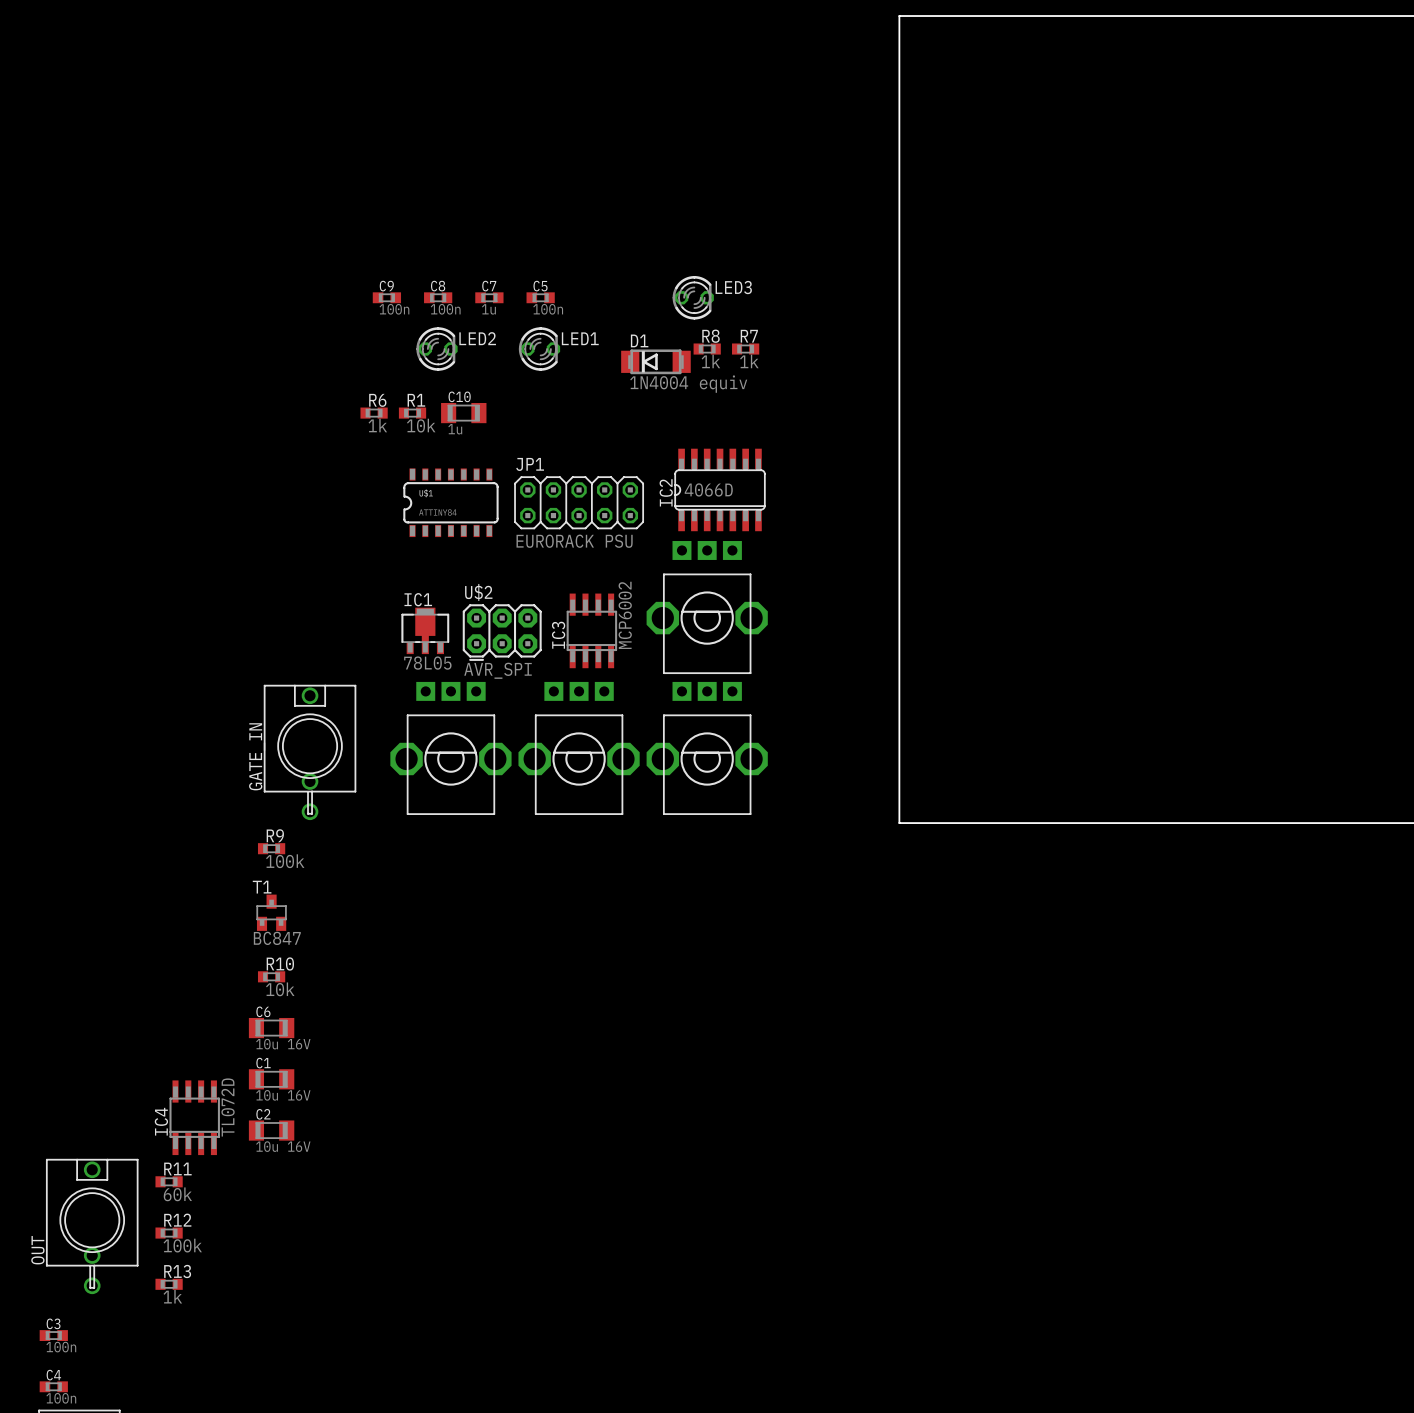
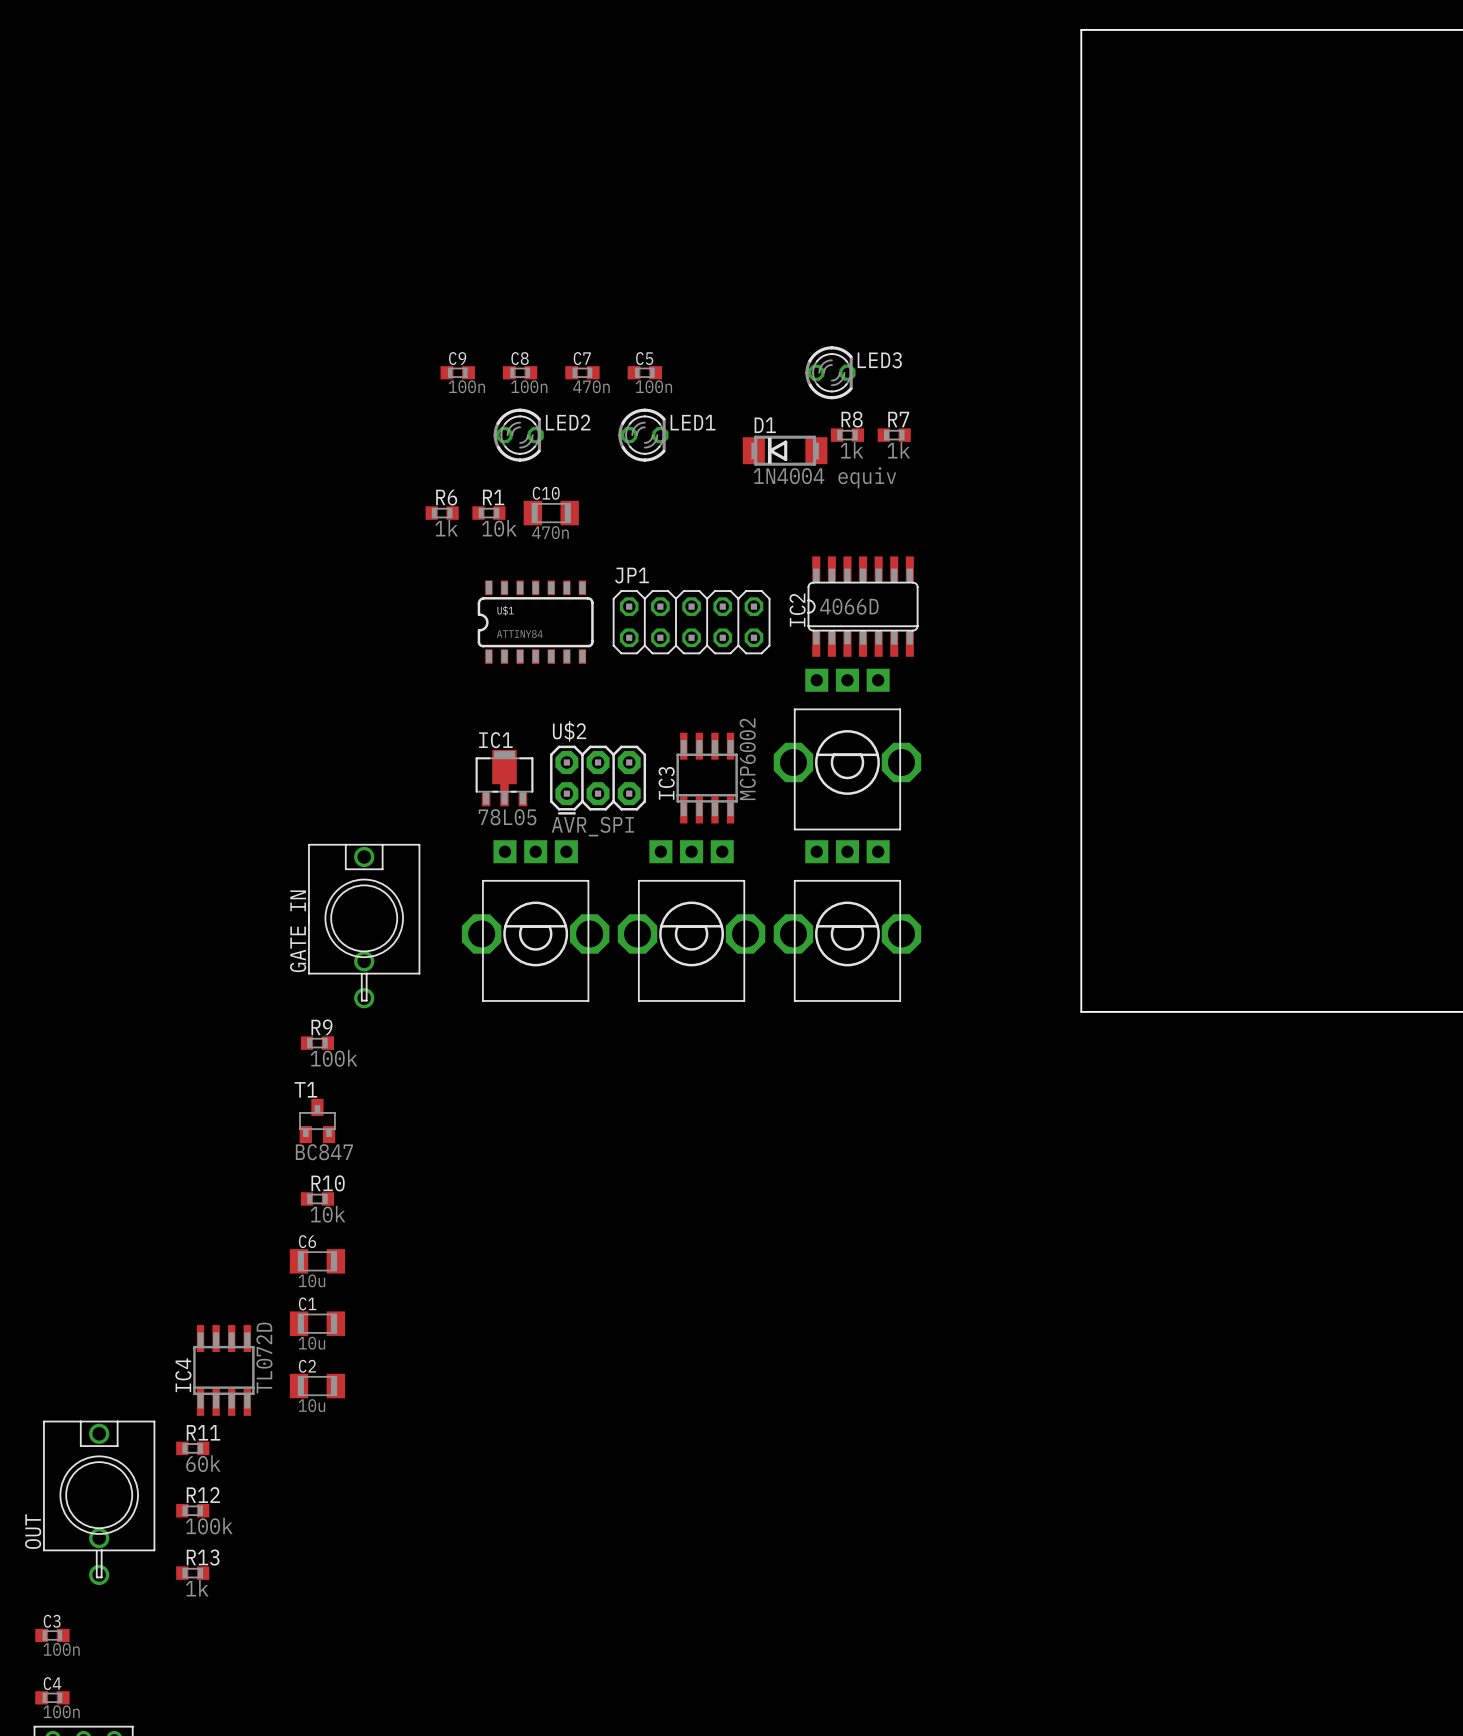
C7 value: 1u (488, 309) -> 470n (591, 386)
C10 value: 1u (455, 429) -> 470n (550, 532)
JP1 value: EURORACK PSU (574, 541) -> none
C6 value: 10u 16V (283, 1044) -> 10u (311, 1280)
C1 value: 10u 16V (283, 1095) -> 10u (311, 1343)
C2 value: 10u 16V (283, 1146) -> 10u (311, 1405)

